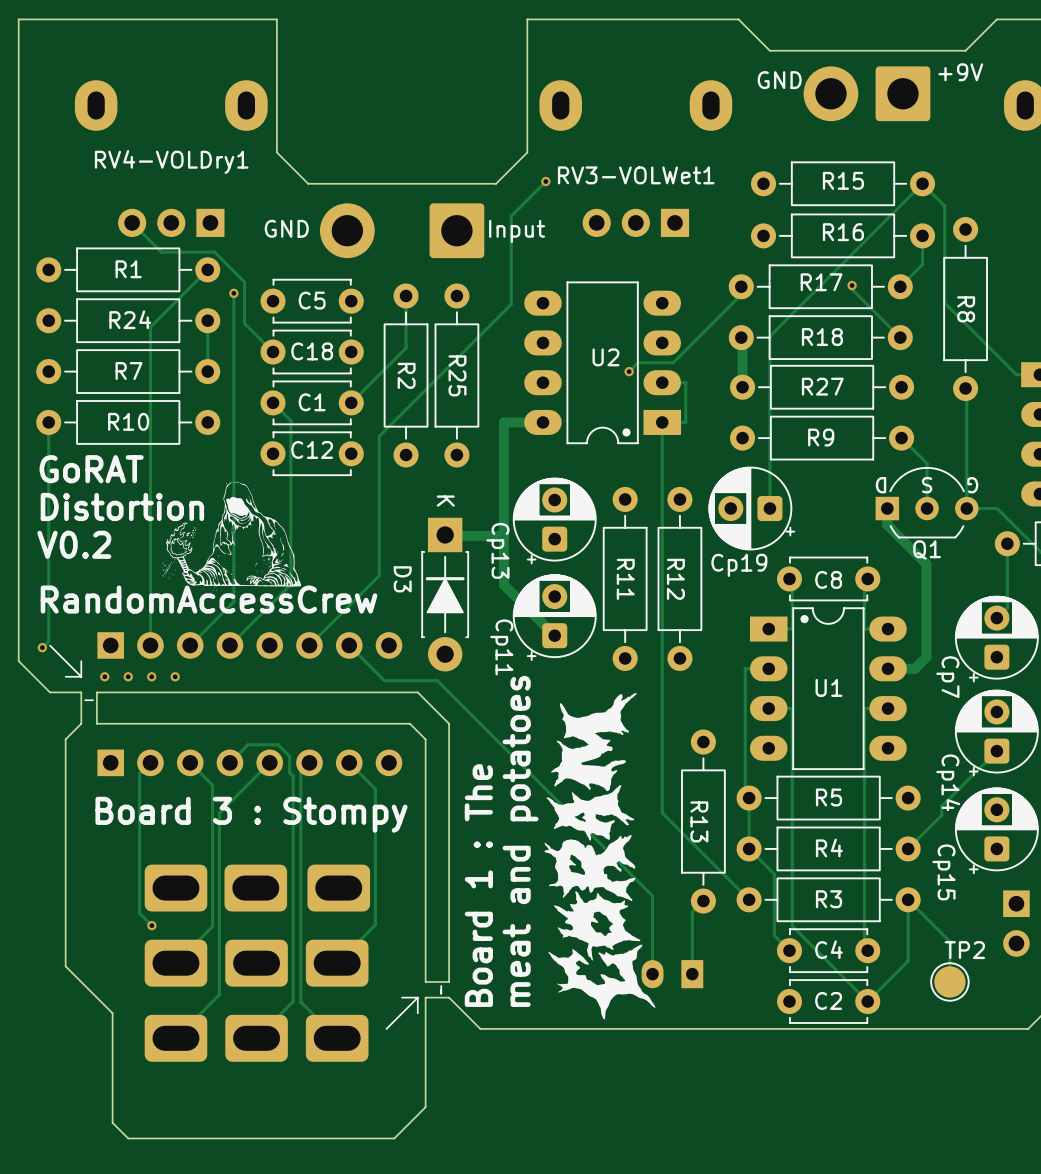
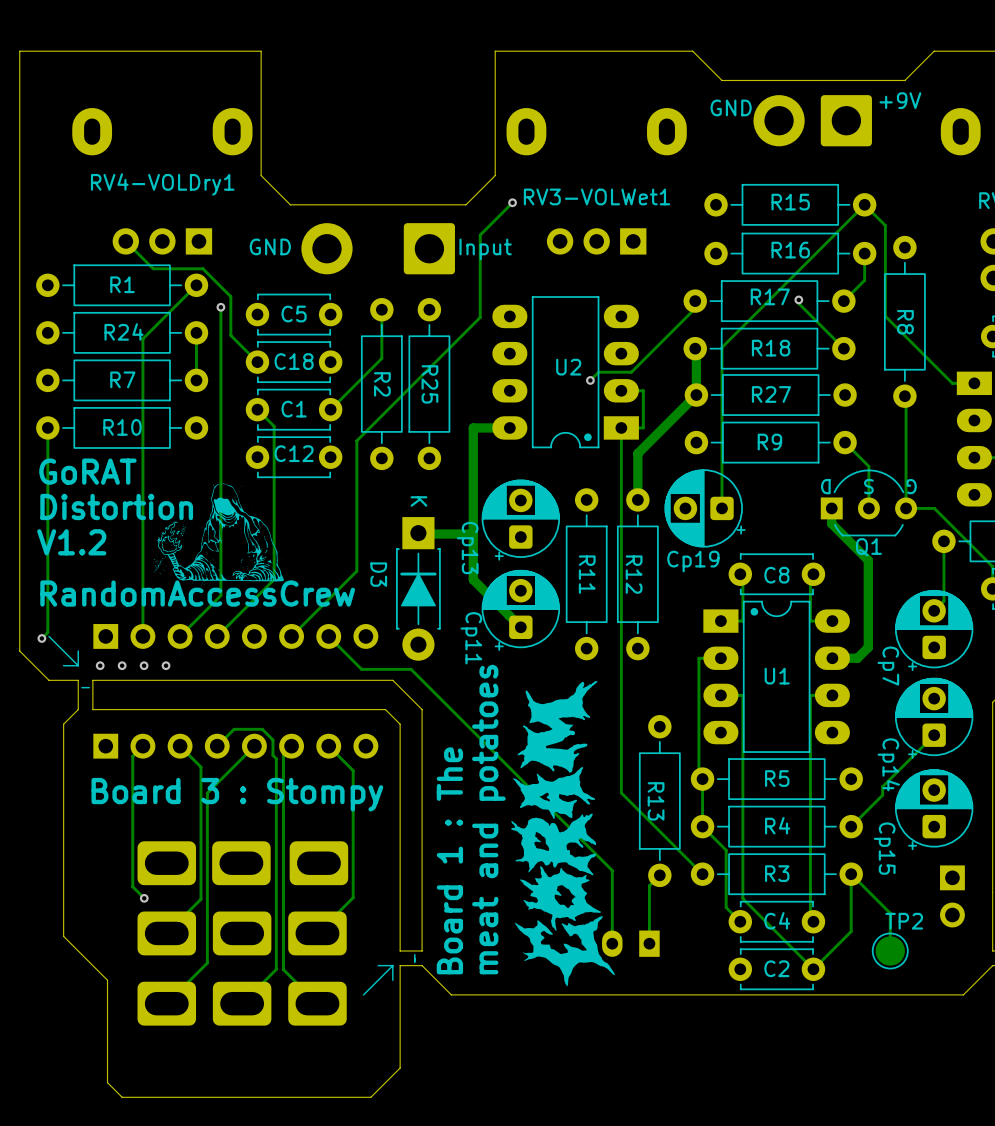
track: none -> (696, 395) (637, 453) (637, 499)
text: V0.2 (74, 544) -> V1.2 (71, 542)

